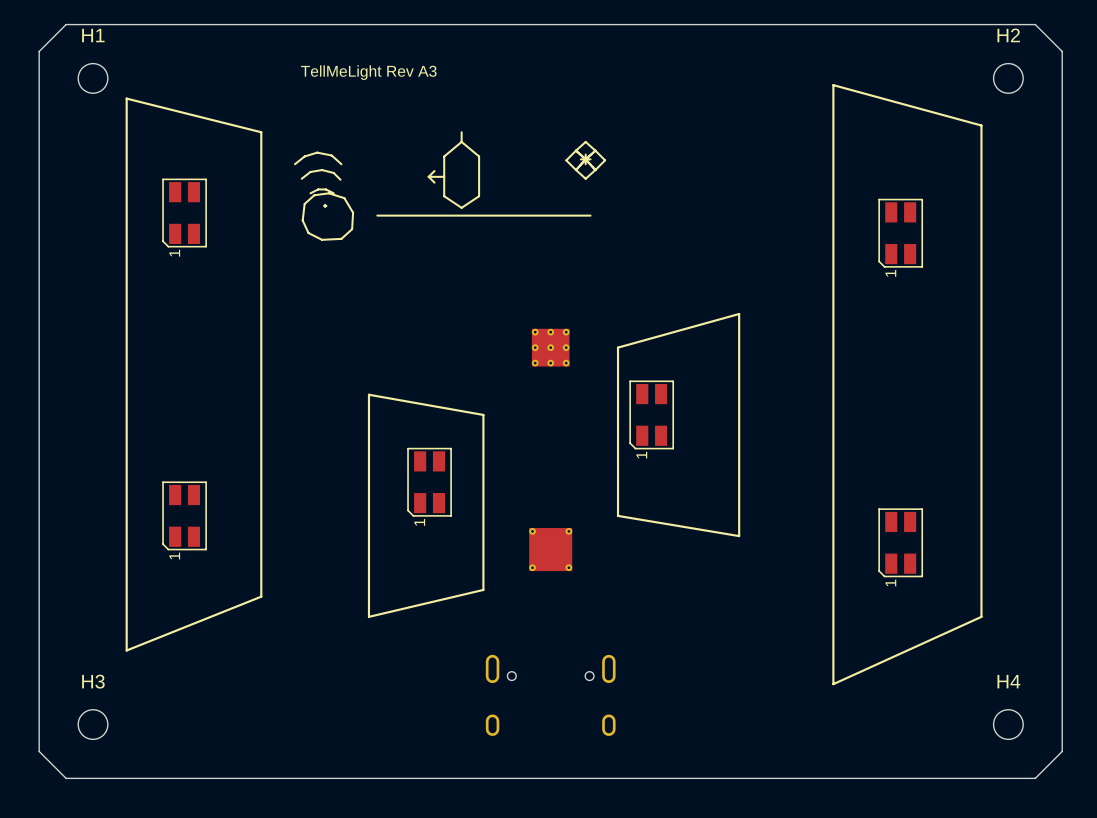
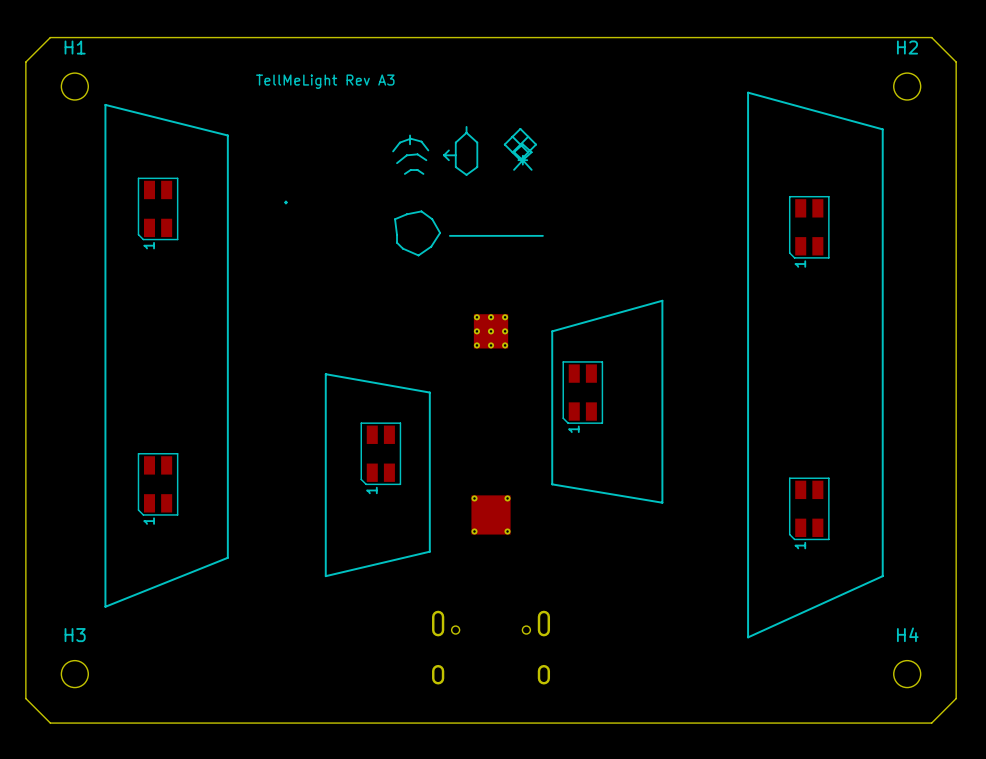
line: none -> (466, 126) (466, 132)
line: none -> (520, 128) (504, 144) (520, 160) (536, 144) (520, 128)
line: none -> (466, 132) (455, 142) (455, 167) (466, 174) (477, 167) (477, 142) (466, 132)
line: none -> (512, 136) (528, 152)
line: none -> (528, 136) (512, 152)
line: (461, 141) (444, 156) (444, 196) (461, 207) (479, 196) (479, 156) (461, 141) -> none
line: none -> (428, 150) (421, 141) (410, 138) (399, 142) (393, 151)
line: none -> (448, 150) (444, 155)
line: (576, 150) (566, 160) (585, 178) (605, 160) (595, 150) -> none
line: none -> (444, 155) (448, 160)
line: none -> (444, 155) (455, 155)
line: none -> (426, 160) (417, 154) (406, 155) (397, 163)
line: (294, 164) (304, 156) (317, 152) (331, 155) (341, 164) -> none
line: (434, 171) (428, 176) -> none
line: none -> (404, 173) (410, 170) (417, 170) (423, 173)
line: (428, 176) (434, 182) -> none
line: (428, 176) (444, 176) -> none
line: (301, 178) (310, 171) (322, 170) (333, 172) (340, 179) -> none
line: (310, 193) (318, 189) (325, 189) (333, 193) -> none
line: (328, 193) (314, 195) (304, 203) (302, 220) (308, 233) (322, 239) (341, 238) (352, 229) (353, 212) (344, 198) (328, 193) -> none
line: (377, 215) (590, 215) -> none
line: none -> (421, 211) (395, 219) (397, 242) (402, 248) (418, 255) (431, 246) (440, 232) (432, 219) (421, 211)
line: none -> (449, 235) (542, 235)

